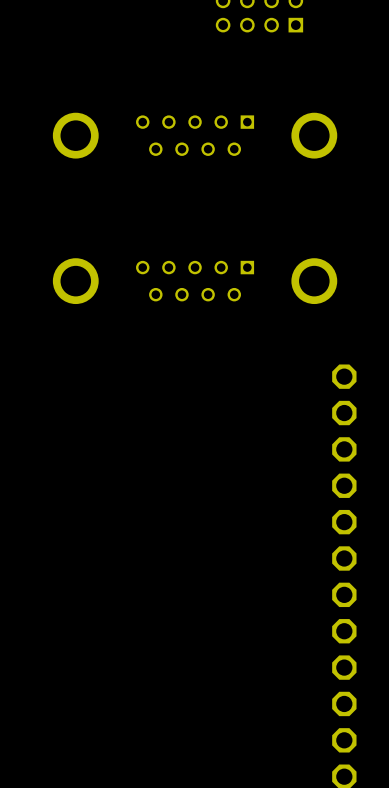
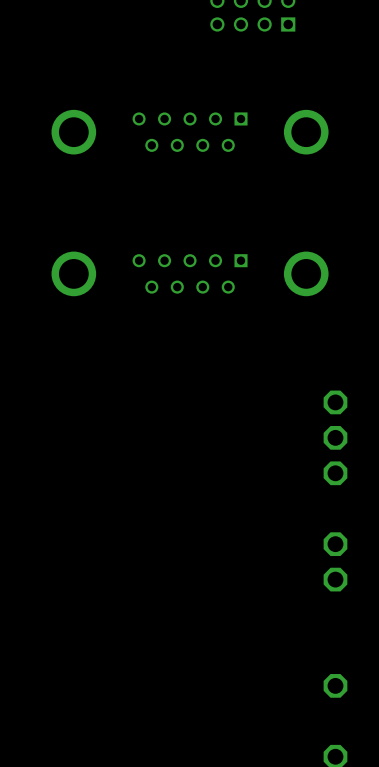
part: (344, 376) -> none
part: (344, 522) -> none
part: (344, 631) -> none
part: (344, 667) -> none
part: (344, 740) -> none

